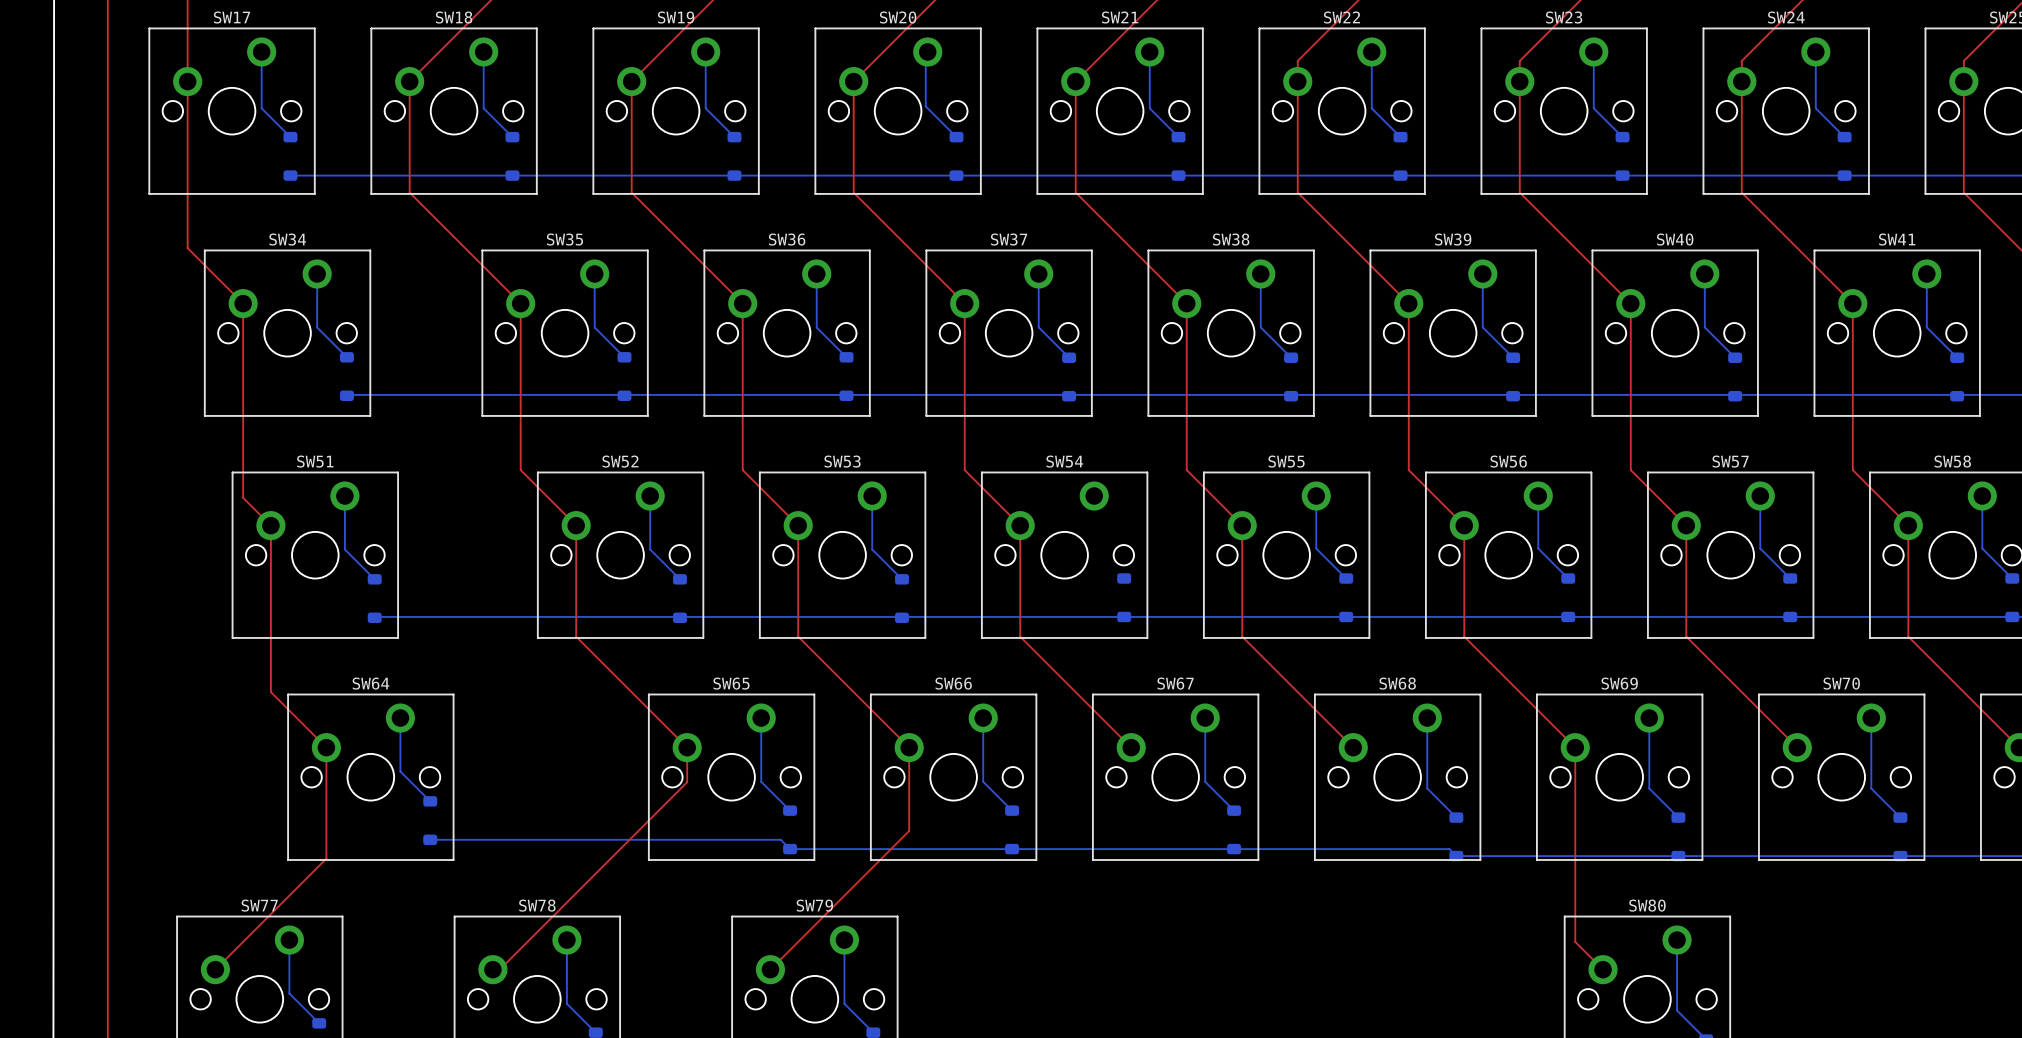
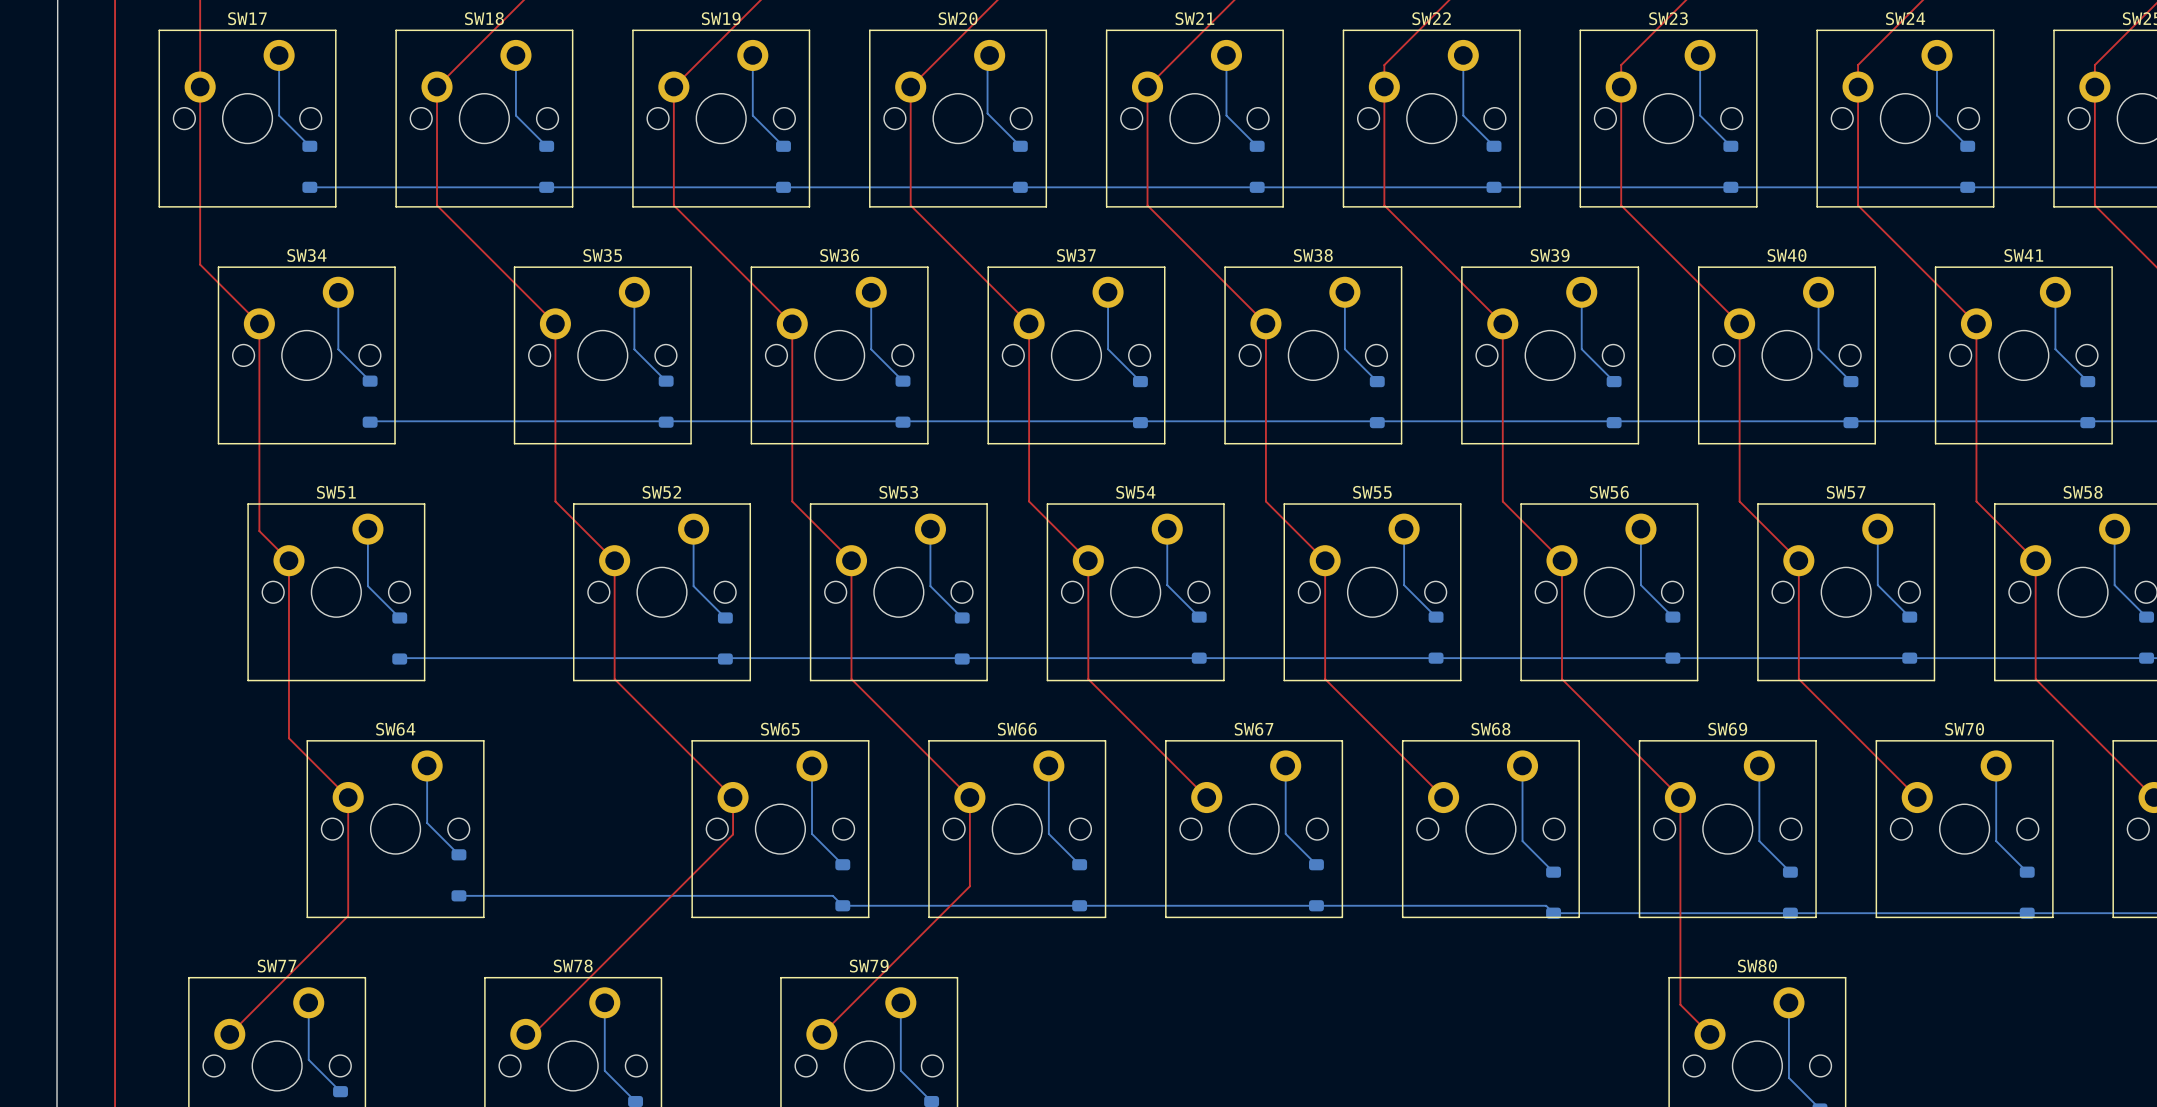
bottom track: none -> (1167, 529) (1167, 585) (1199, 617)

